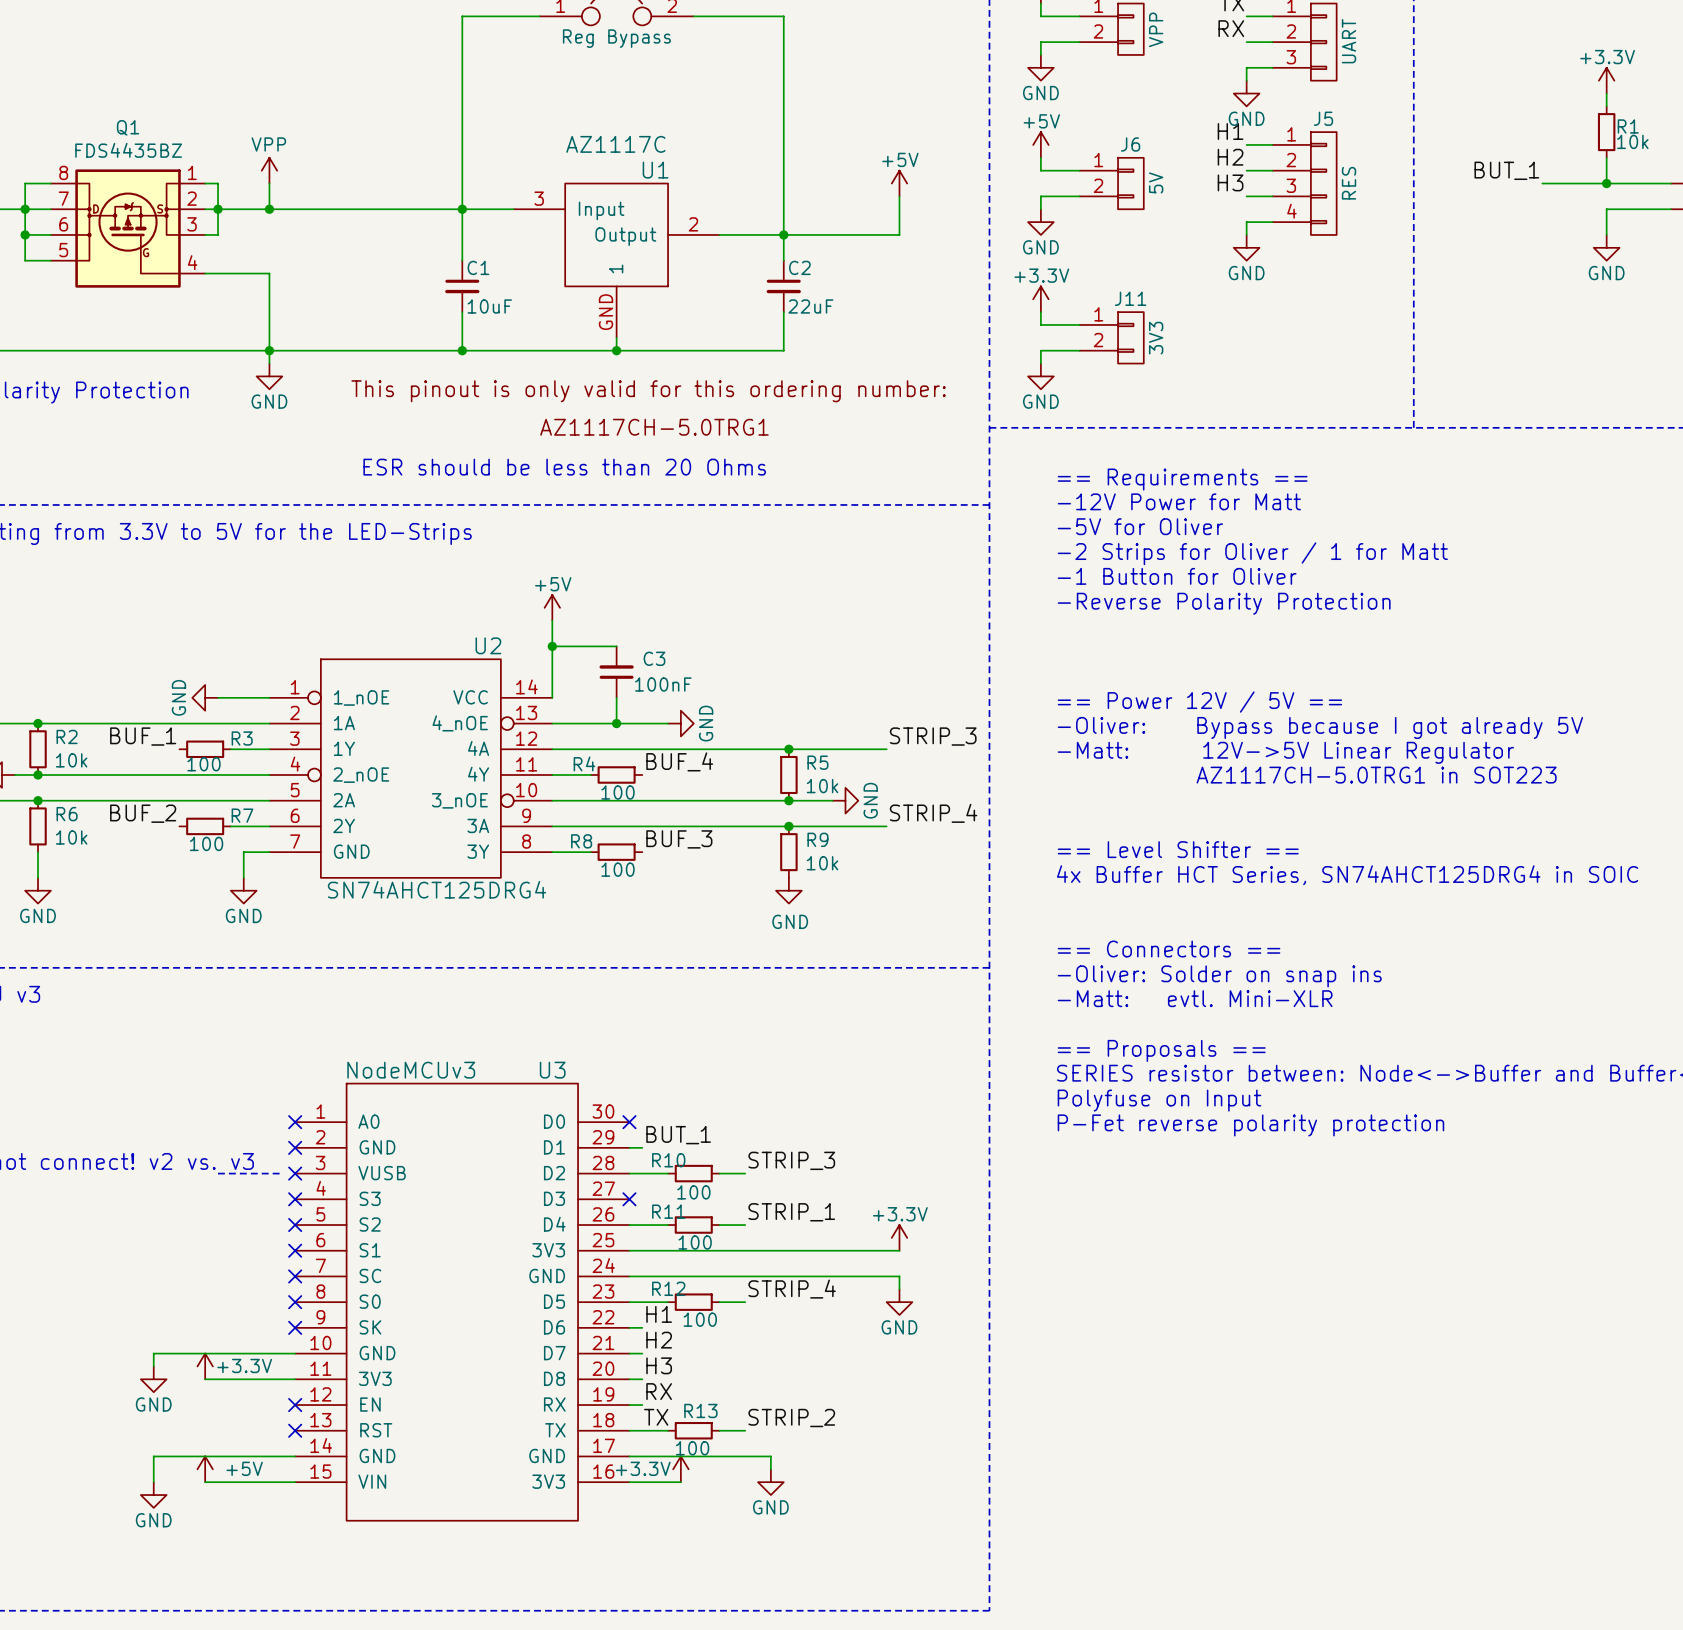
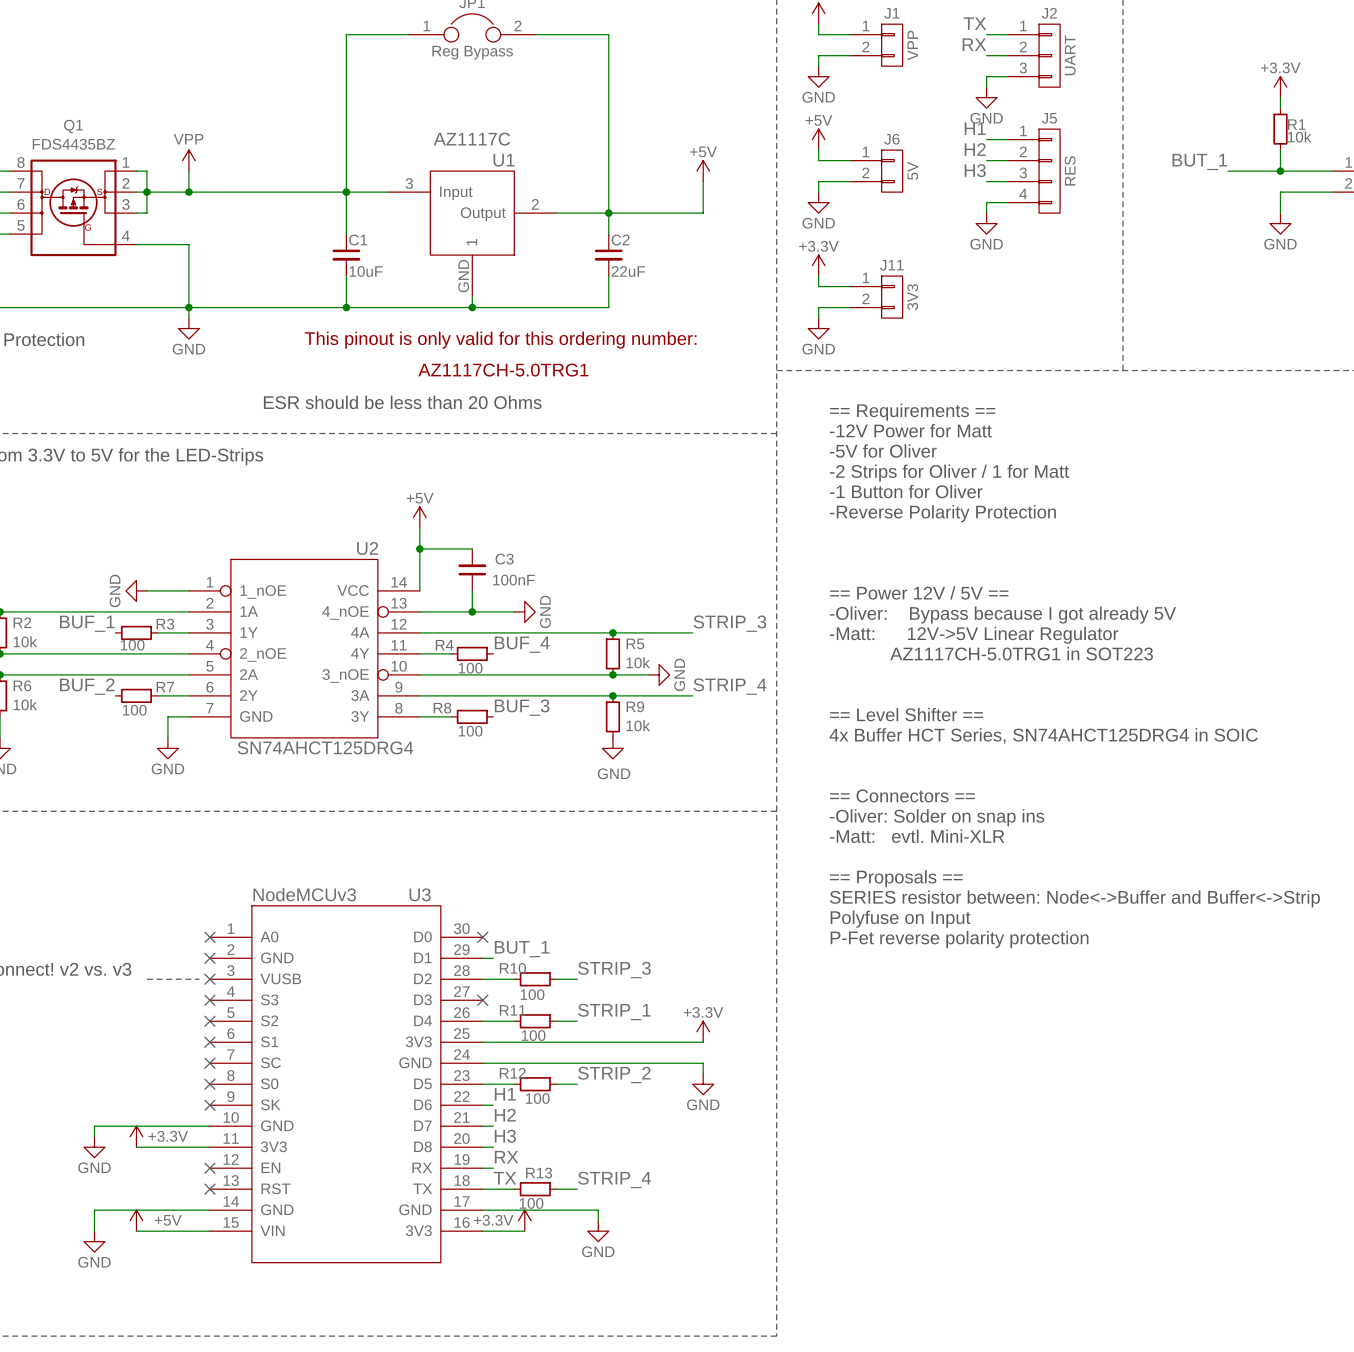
label: STRIP_4 (792, 1289) -> STRIP_2 (614, 1074)
label: STRIP_2 (791, 1418) -> STRIP_4 (614, 1179)

